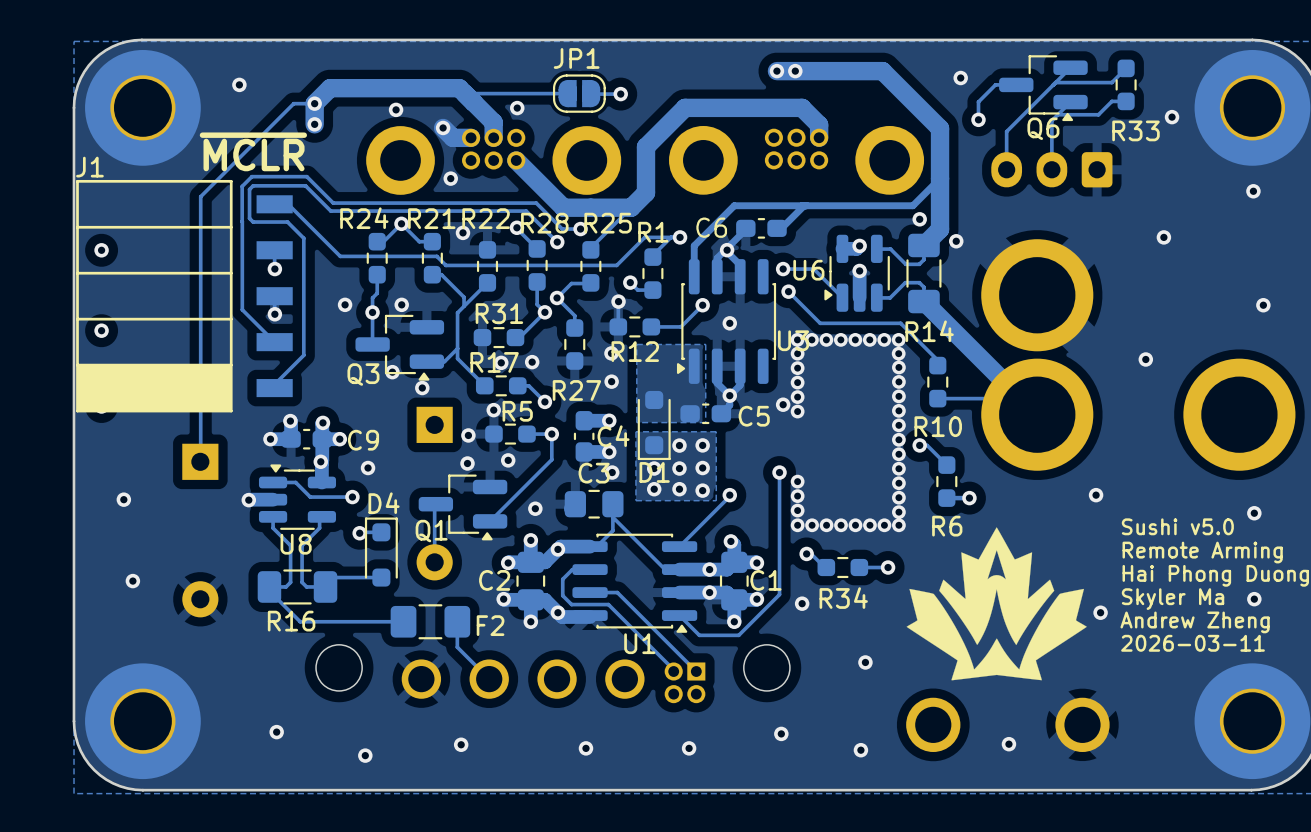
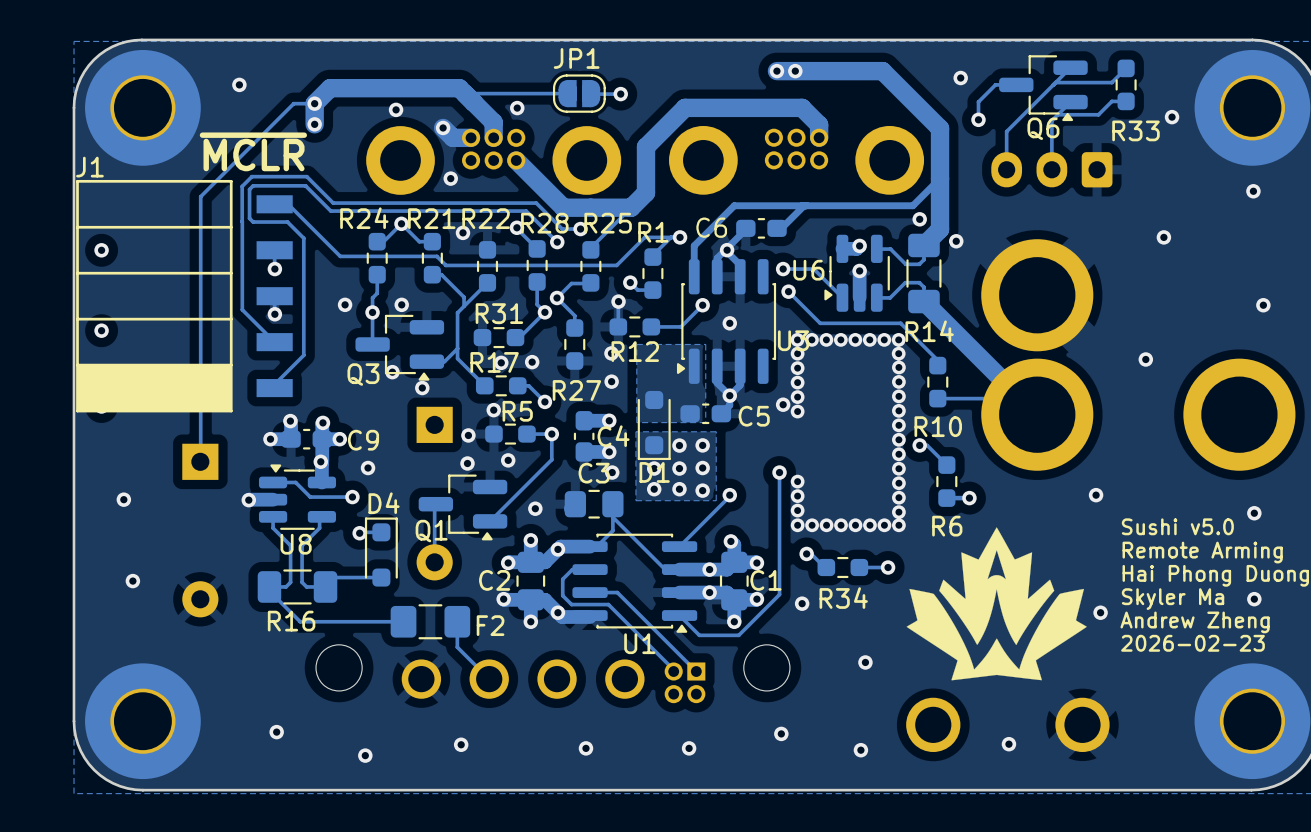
text: 2026-03-11 (1193, 643) -> 2026-02-23 (1193, 643)

